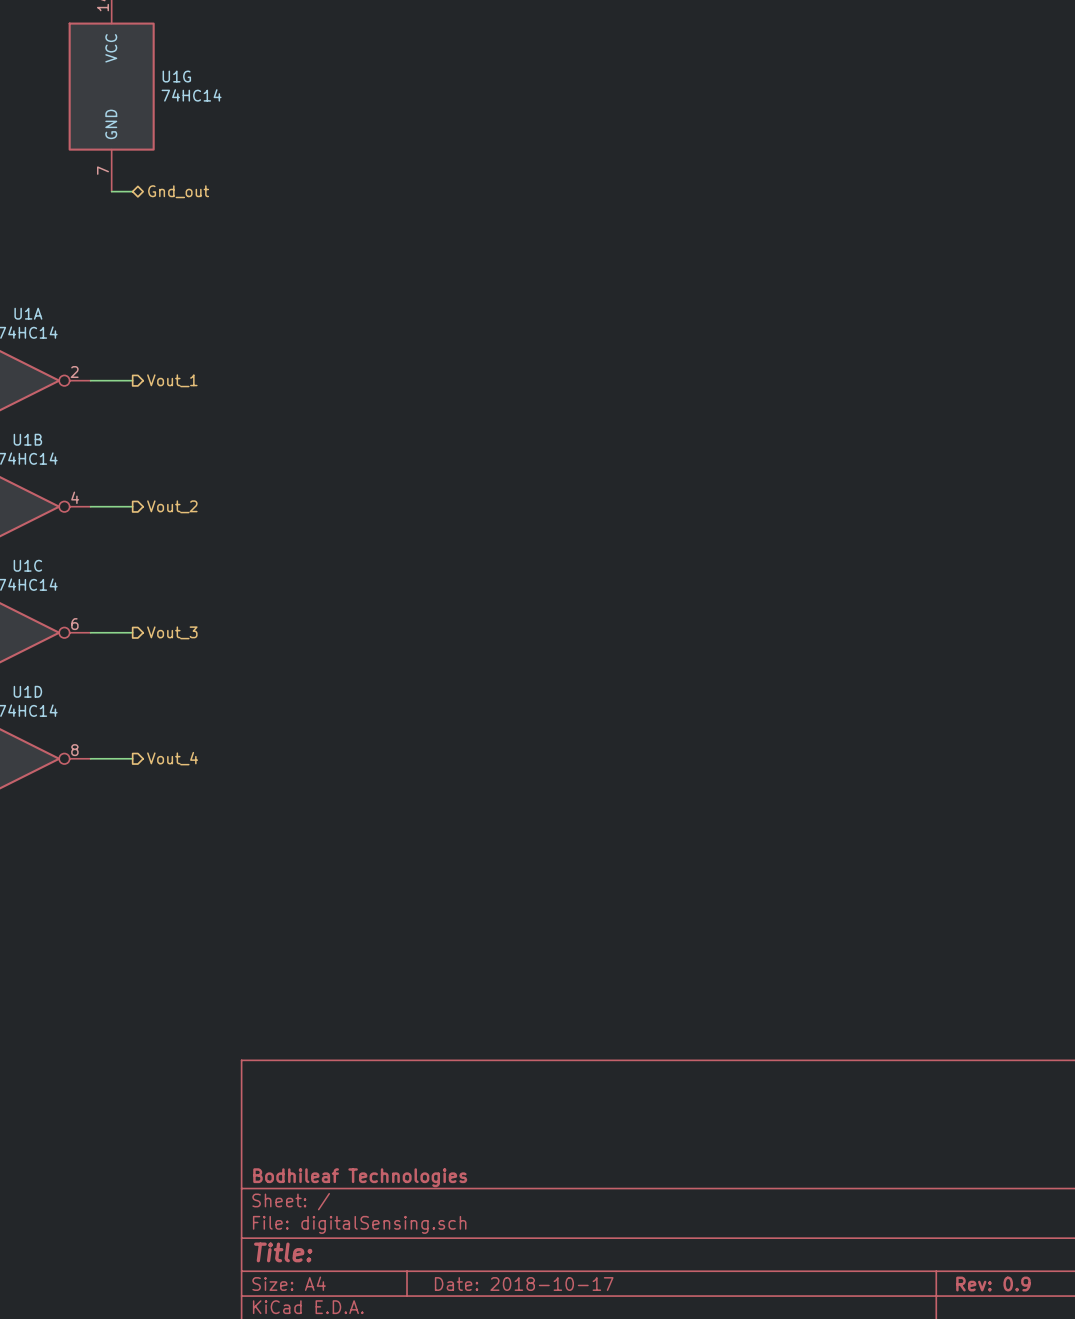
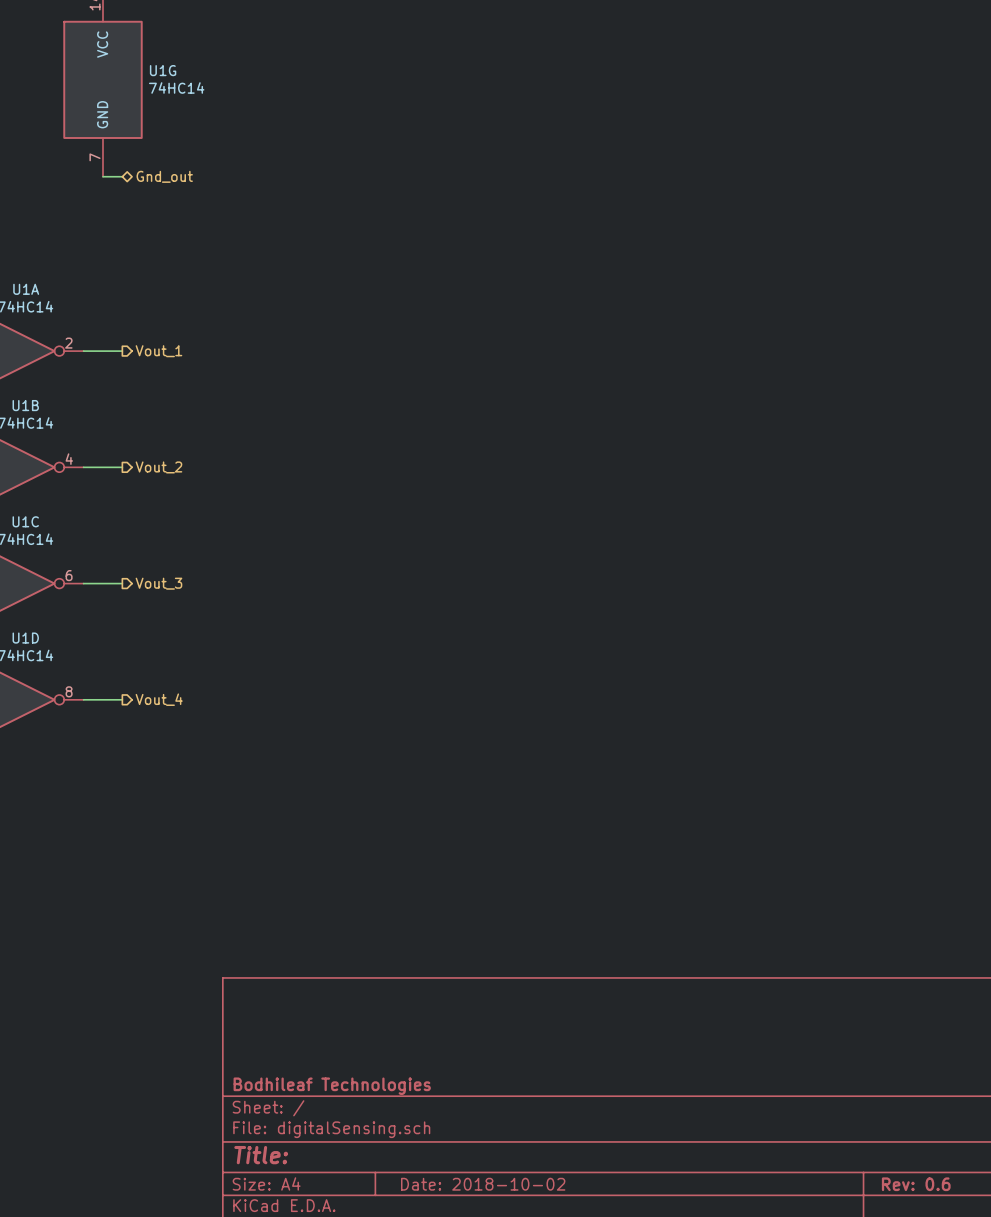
title block: Date: 2018-10-17 (524, 1284) -> Date: 2018-10-02 (483, 1184)
title block: Rev: 0.9 (993, 1284) -> Rev: 0.6 (916, 1184)

